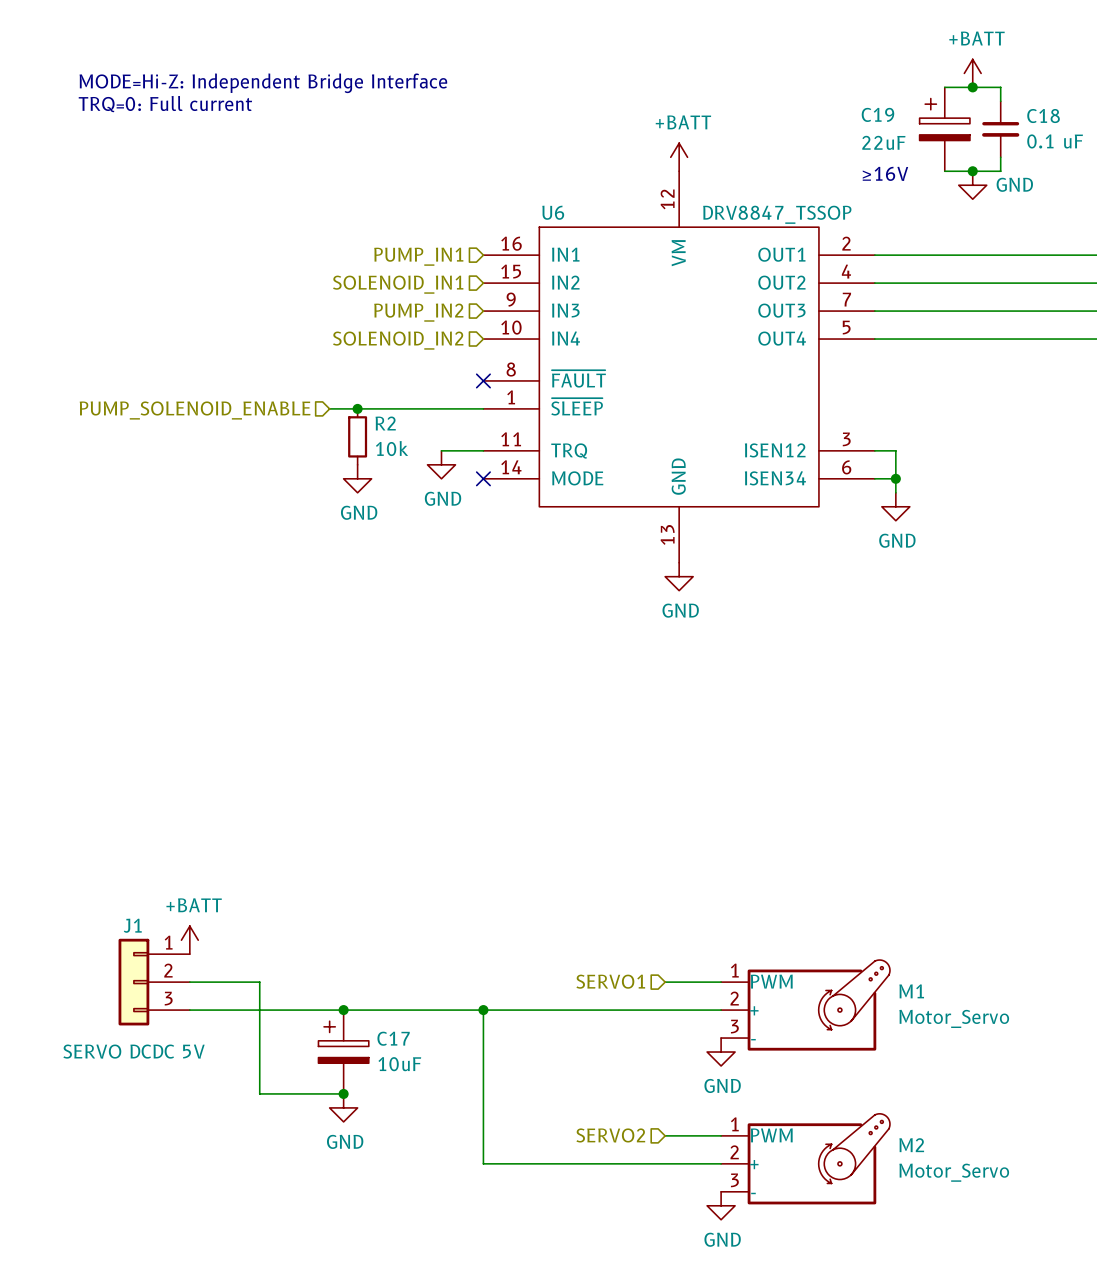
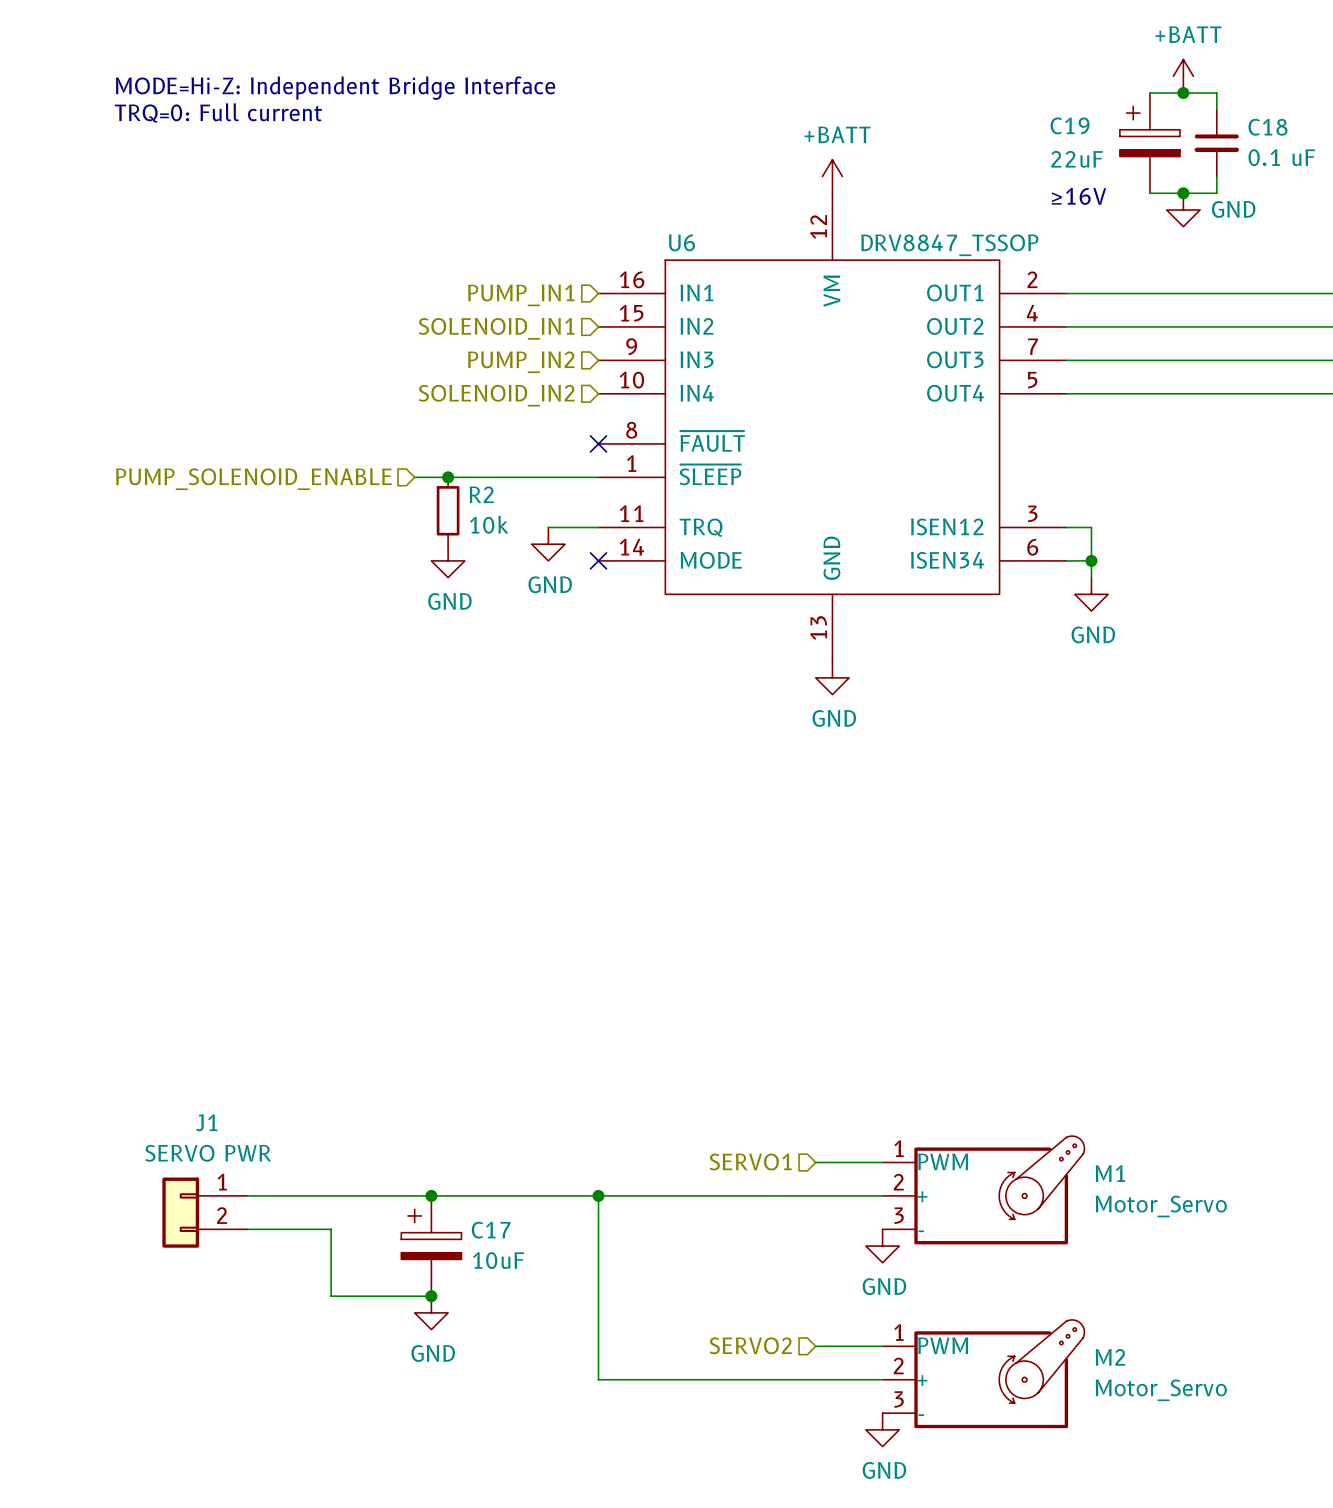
J1 name position: J1 (132, 925) -> J1 (206, 1122)
J1 symbol: [118, 938, 190, 1026] -> [162, 1177, 248, 1248]
power symbol: +BATT (189, 940) -> none
wire: (189, 982) (259, 982) (259, 1038) -> (247, 1229) (331, 1229)
J1 value: SERVO DCDC 5V (134, 1051) -> SERVO PWR (208, 1153)

